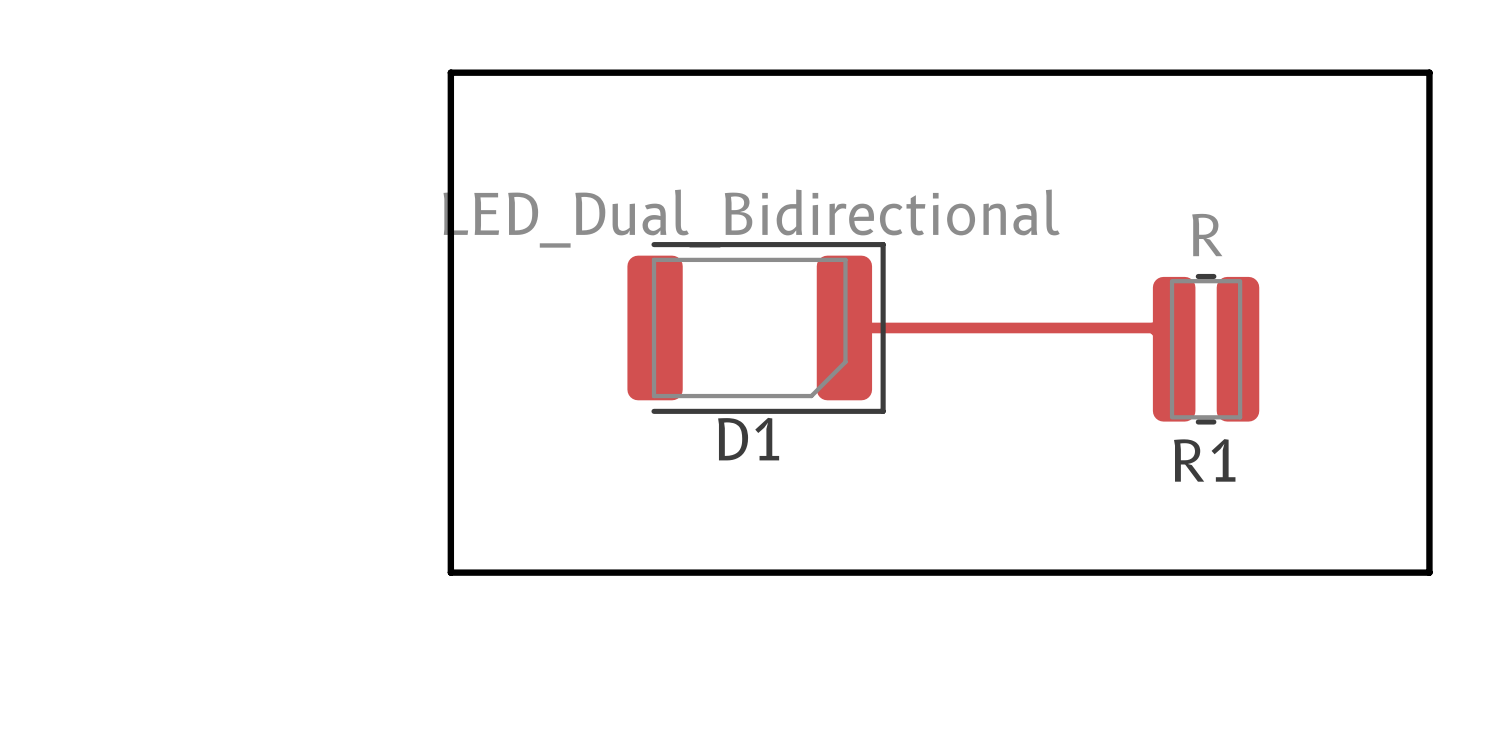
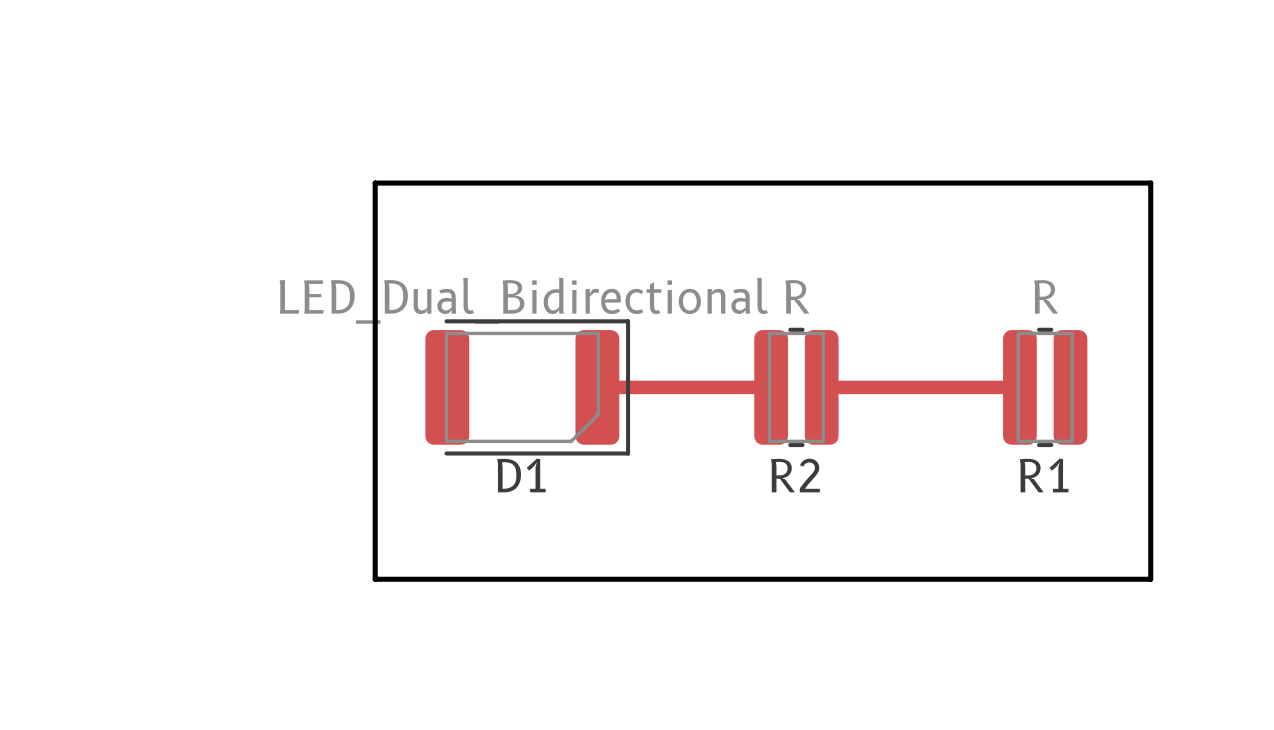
D1 position: (756, 327) -> (527, 387)
track: (844, 327) (1152, 327) (1174, 349) -> none
track: none -> (597, 387) (771, 387)
R2: none -> R (796, 387)
track: none -> (821, 387) (1019, 387)
R1 position: (1206, 349) -> (1045, 387)

